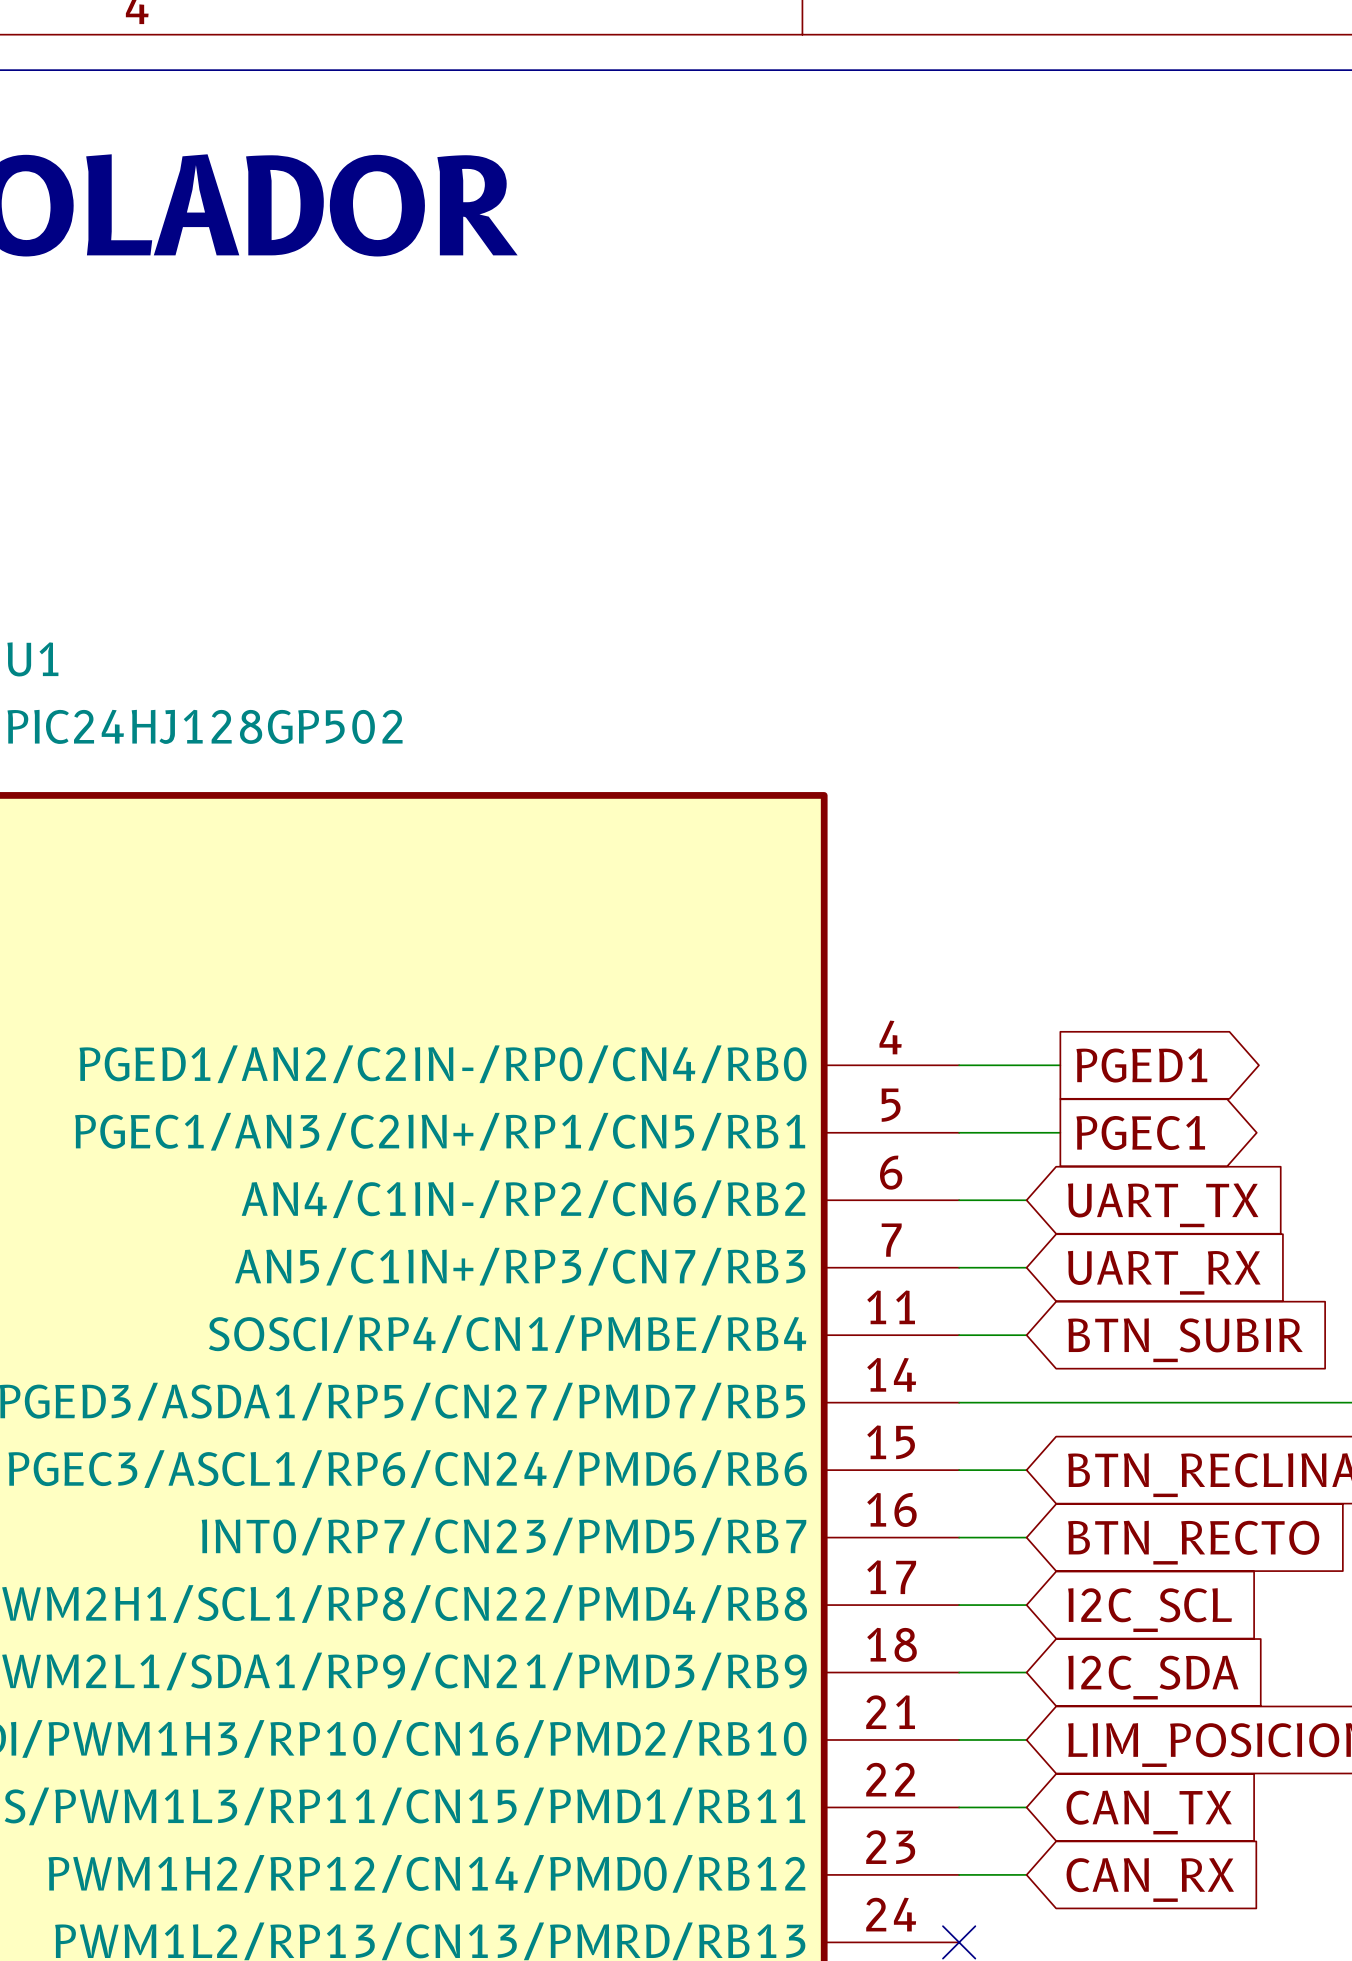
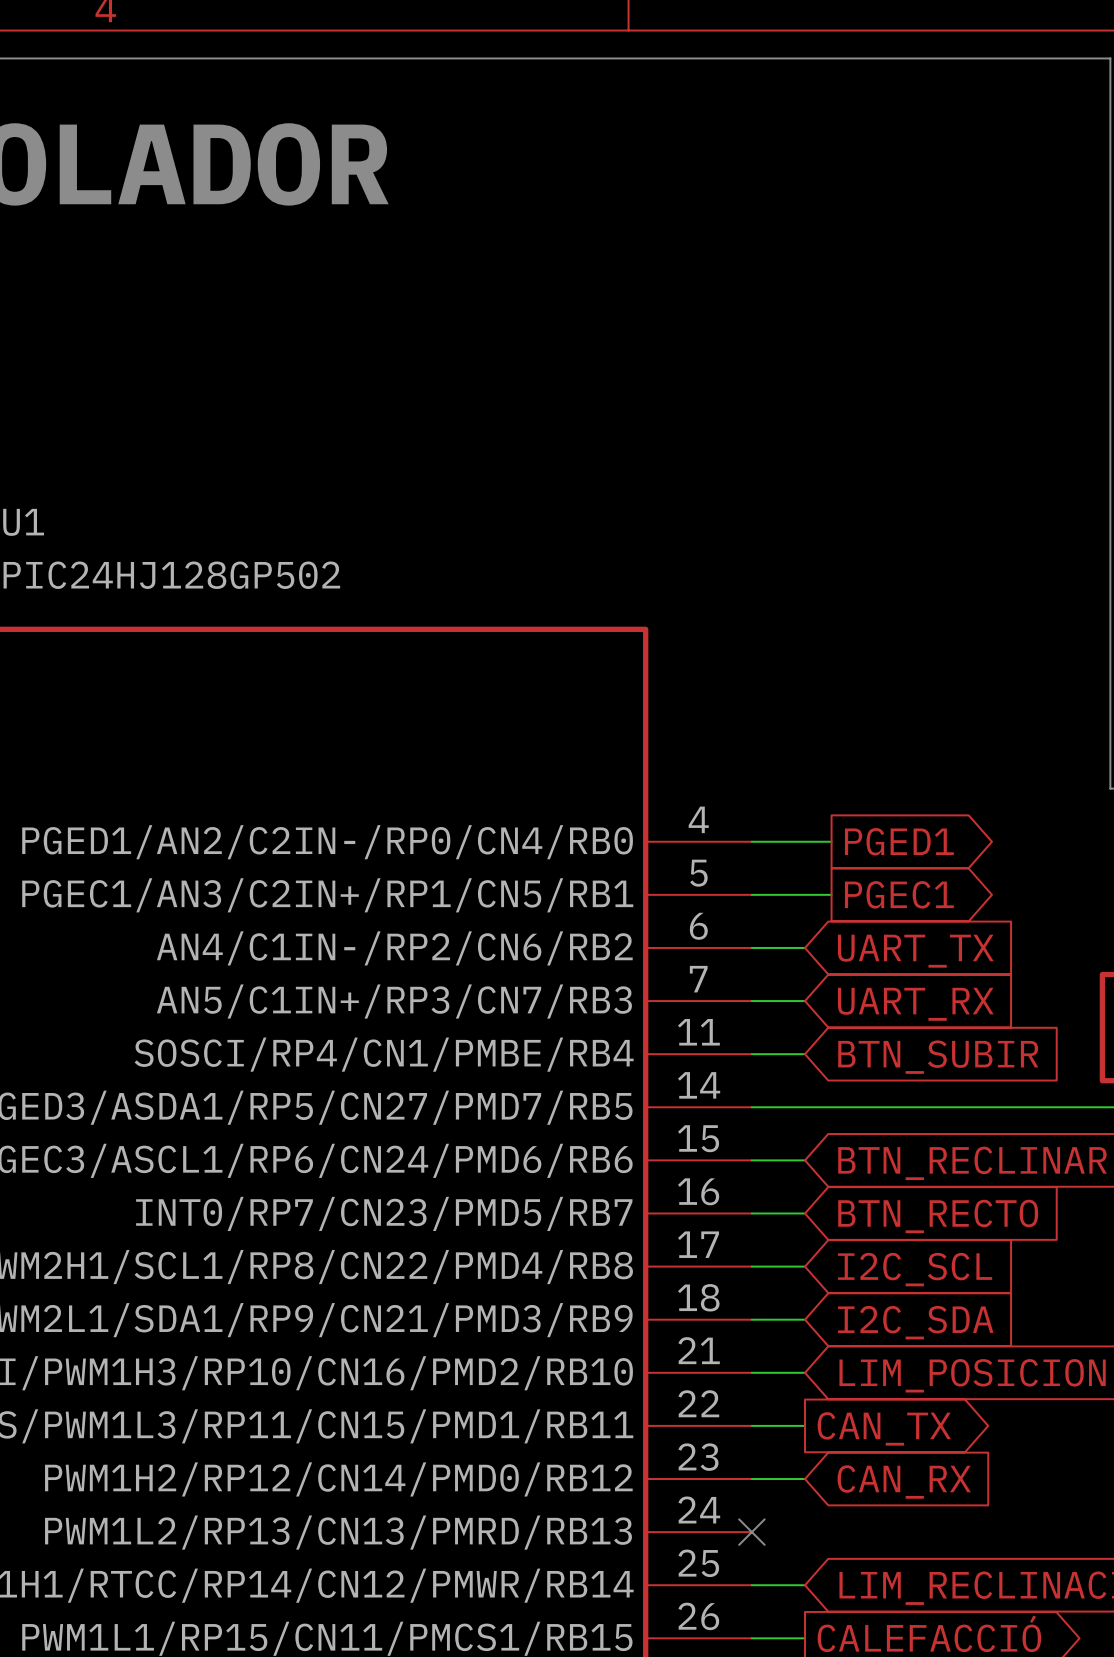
global label shape: input (1149, 1812) -> output (884, 1428)

